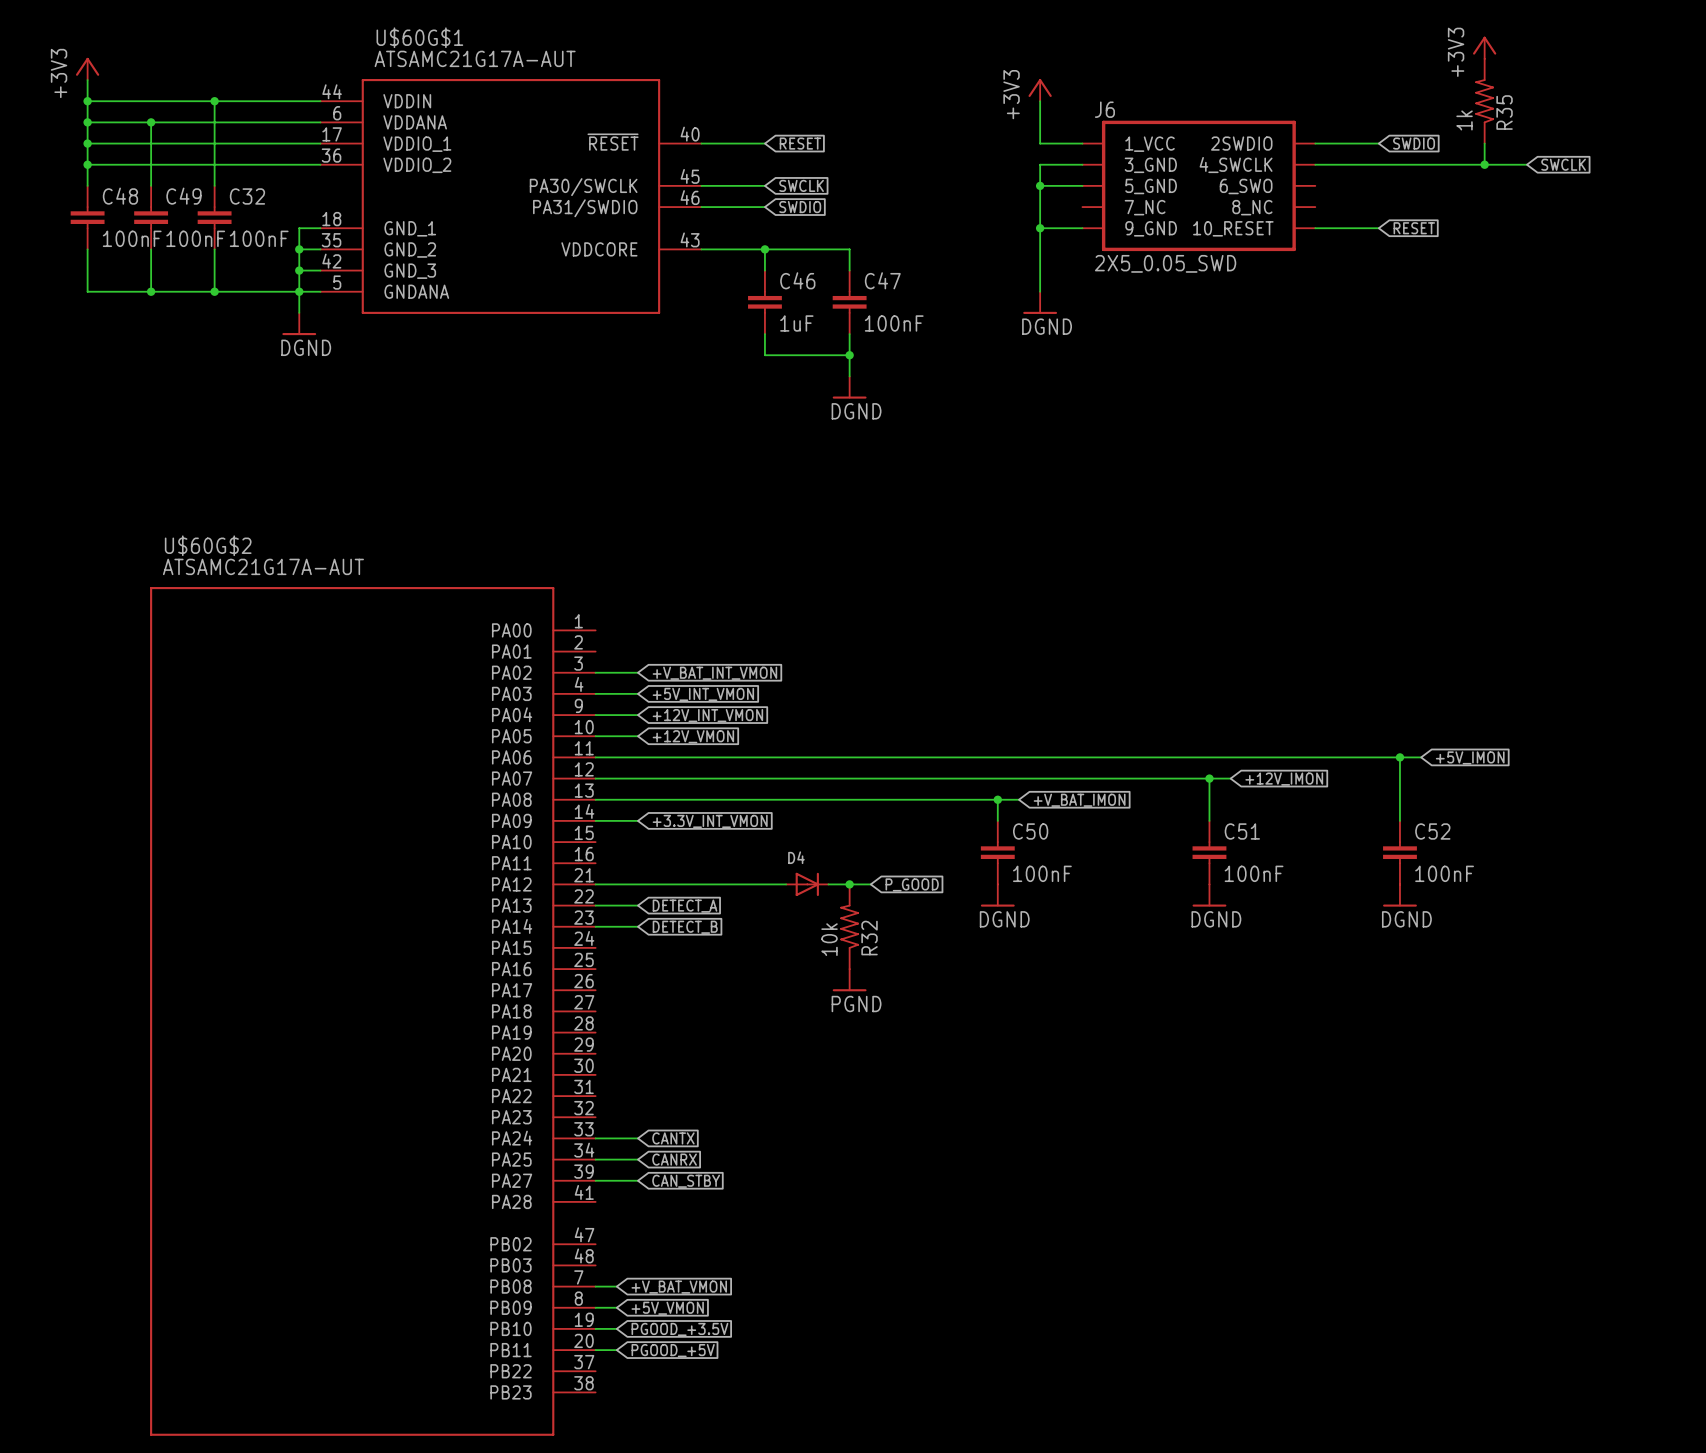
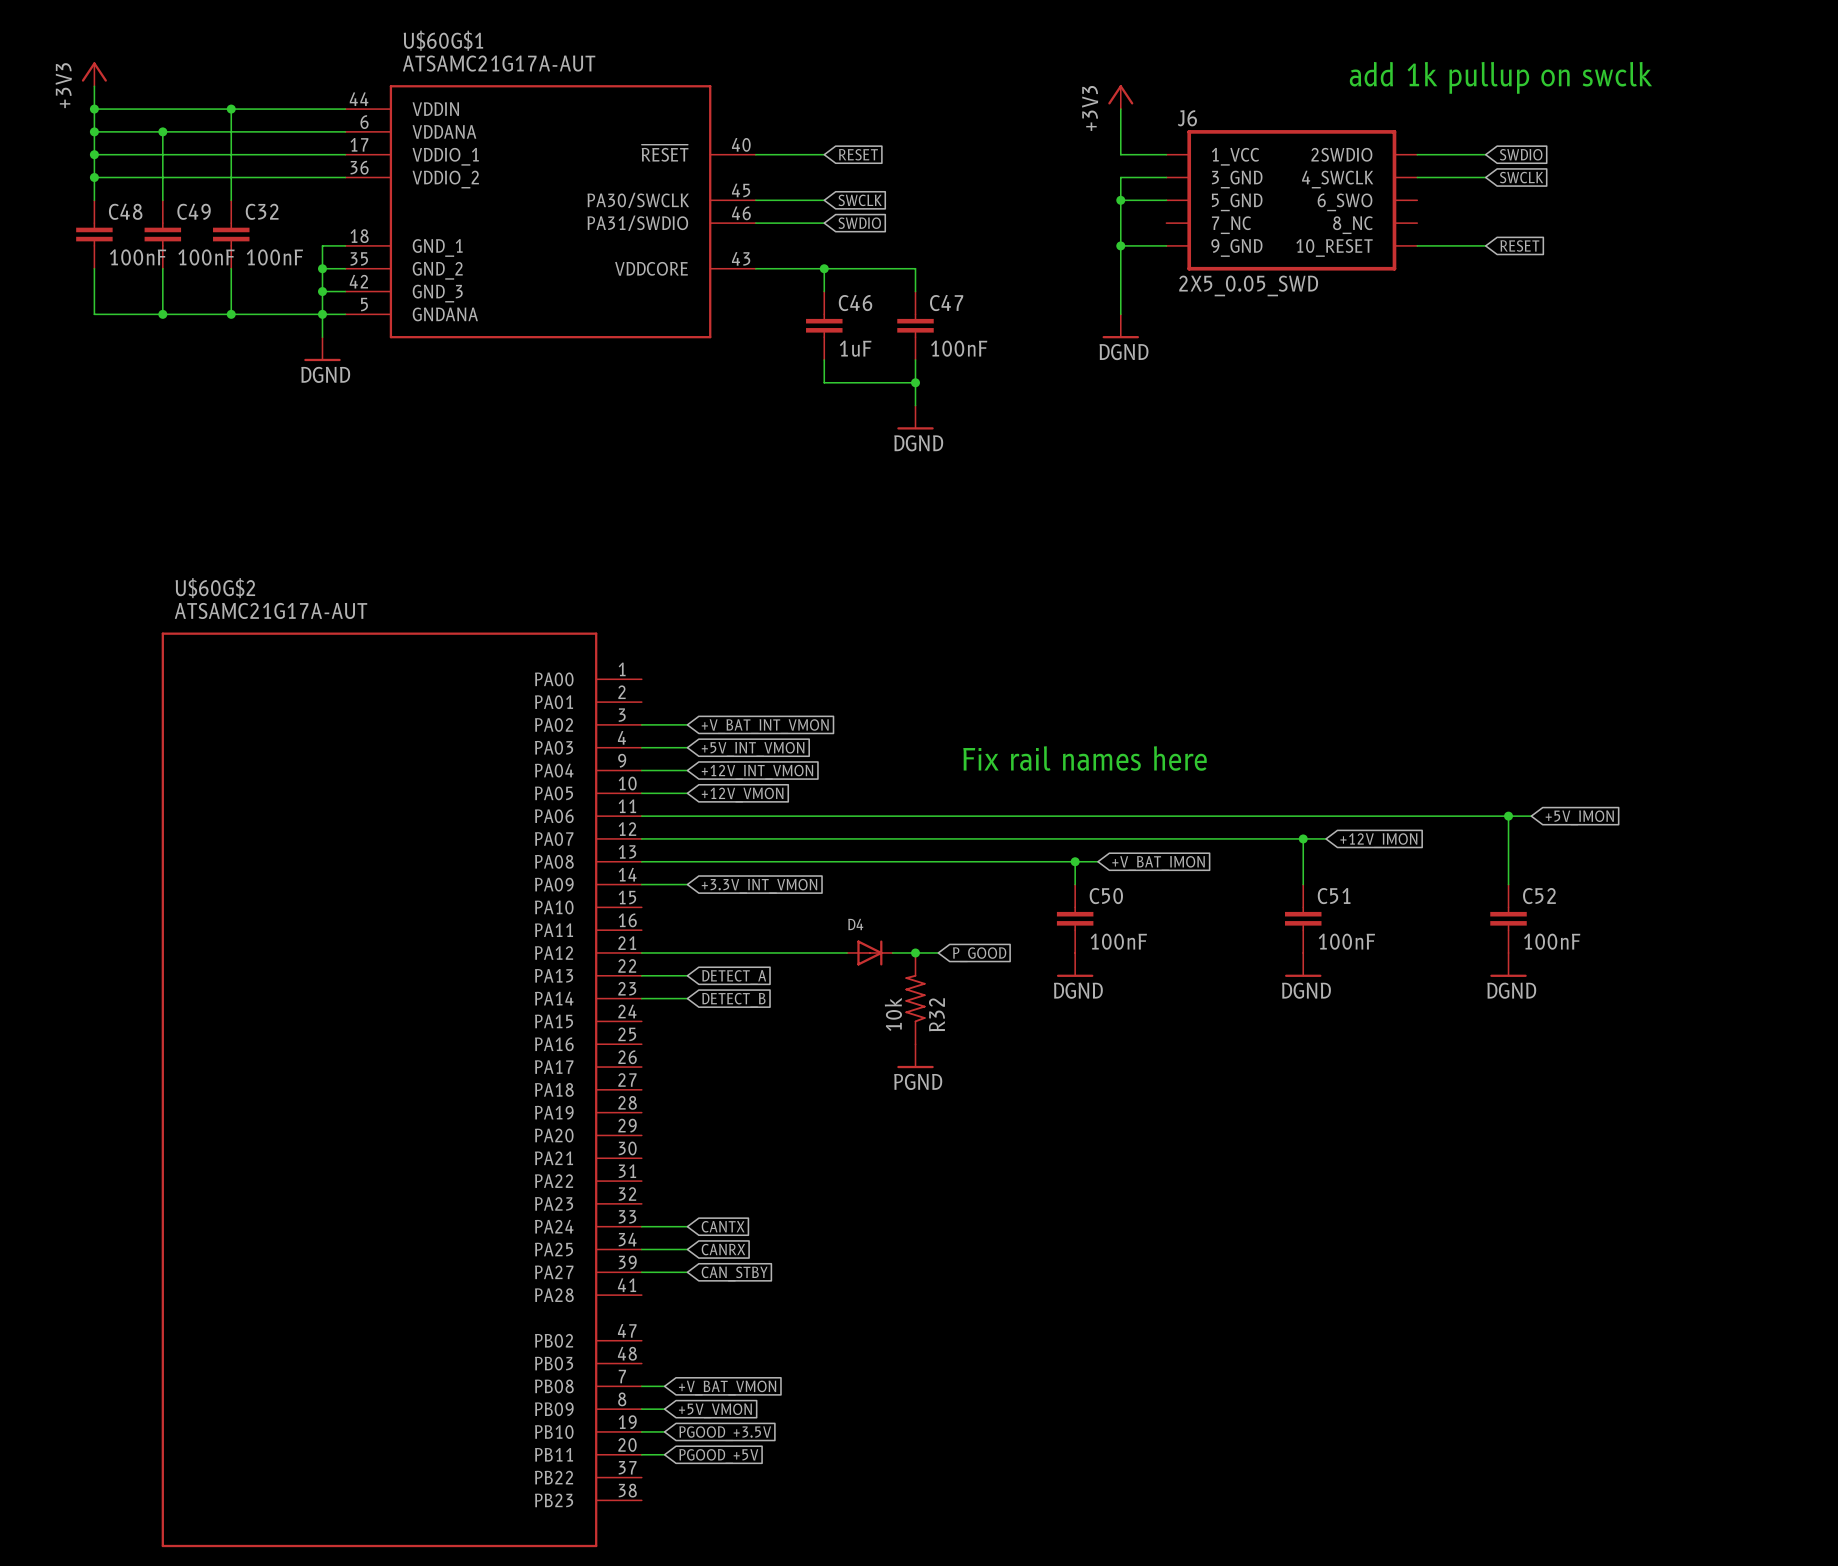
power symbol: +3V3 (1484, 47) -> none
text: none -> add 1k pullup on swclk (1500, 77)
R35: 1k (1484, 101) -> none
wire: (1484, 143) (1484, 164) -> none
wire: (1378, 164) (1526, 164) -> none
junction: (1484, 164) -> none
global label position: SWCLK (1563, 164) -> SWCLK (1521, 177)
text: none -> Fix rail names here (1085, 758)

